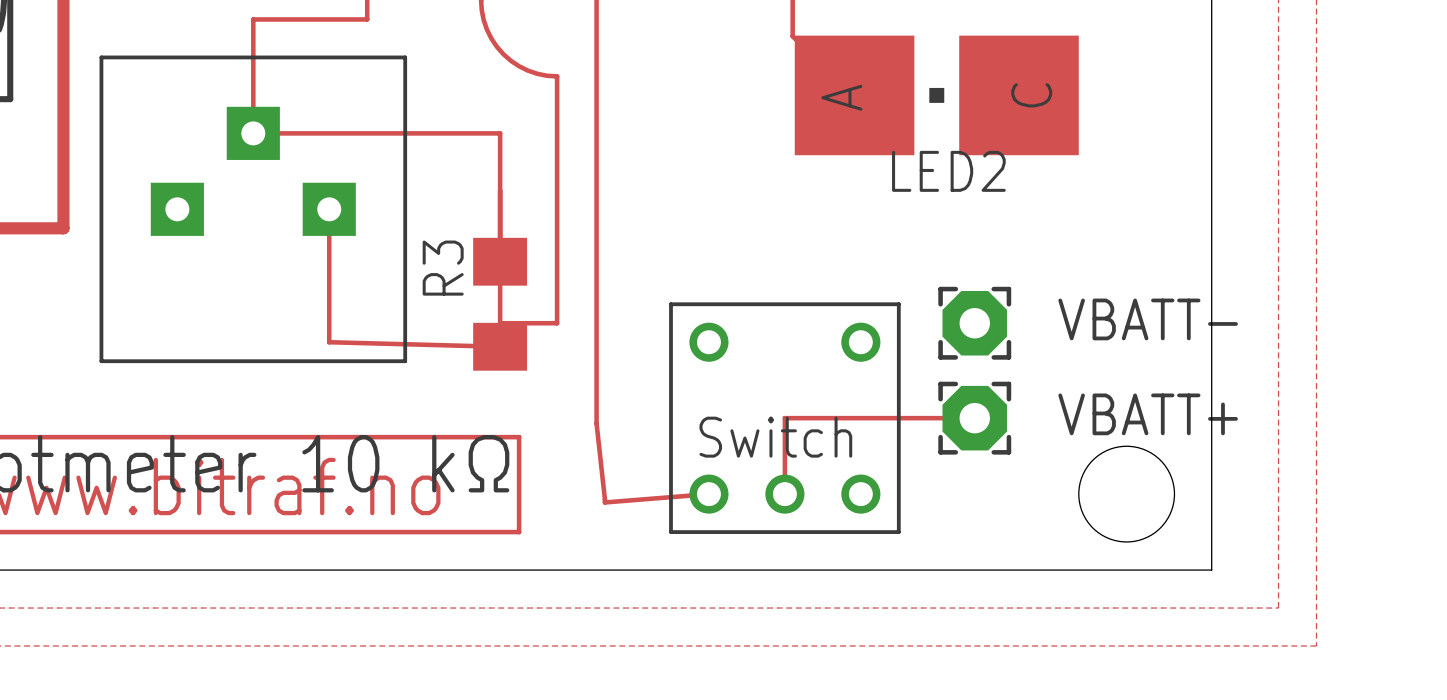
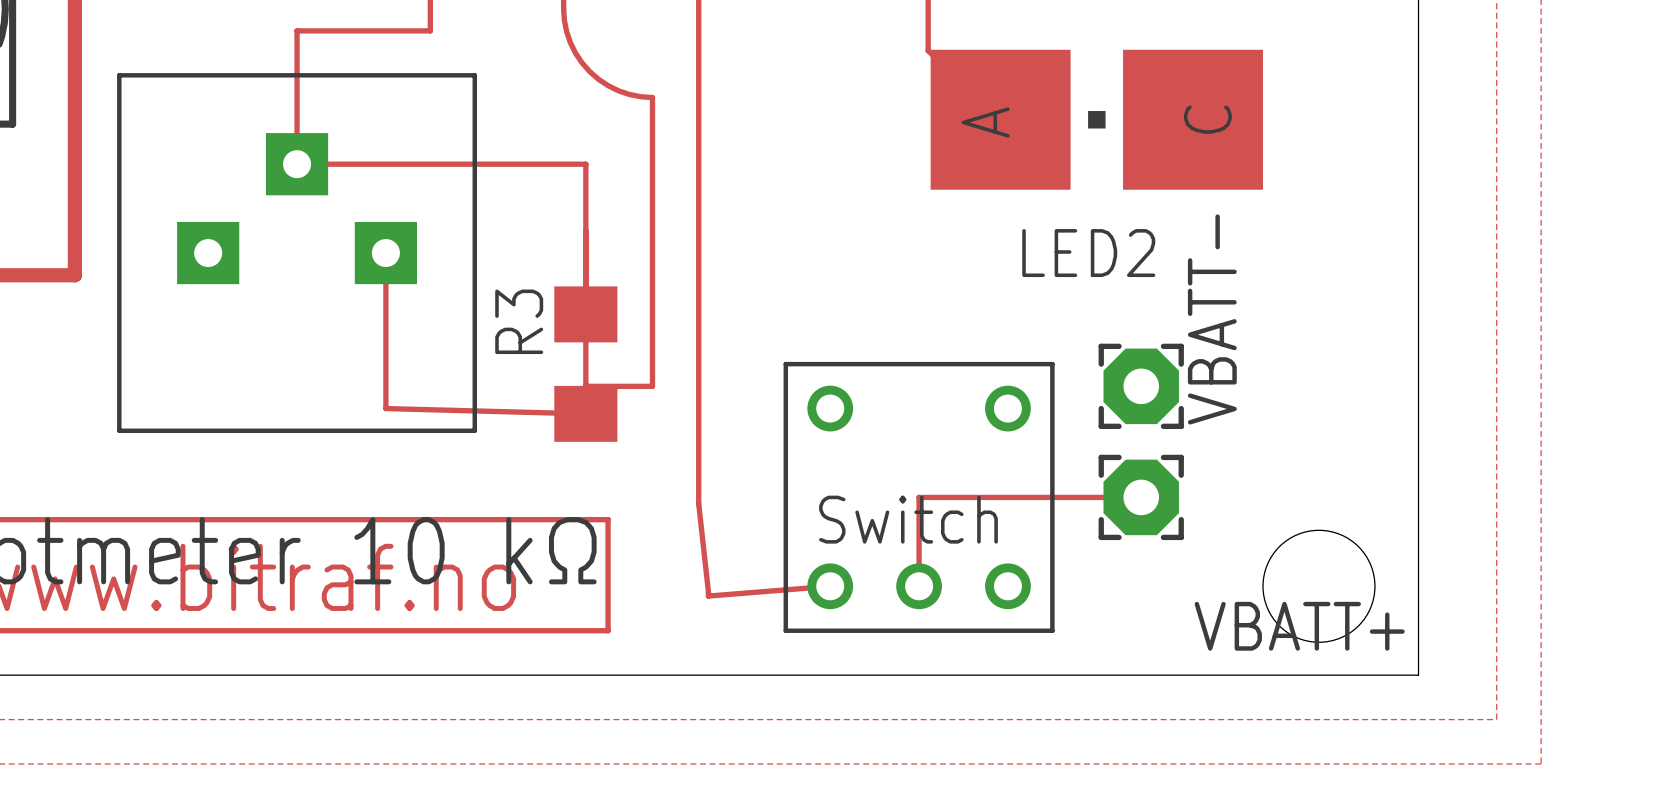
LED2 name position: LED2 (948, 171) -> LED2 (1088, 253)
VBATT- name rotation: 0° (1148, 319) -> 90° counterclockwise (1212, 319)
VBATT+ name position: VBATT+ (1148, 414) -> VBATT+ (1299, 626)

